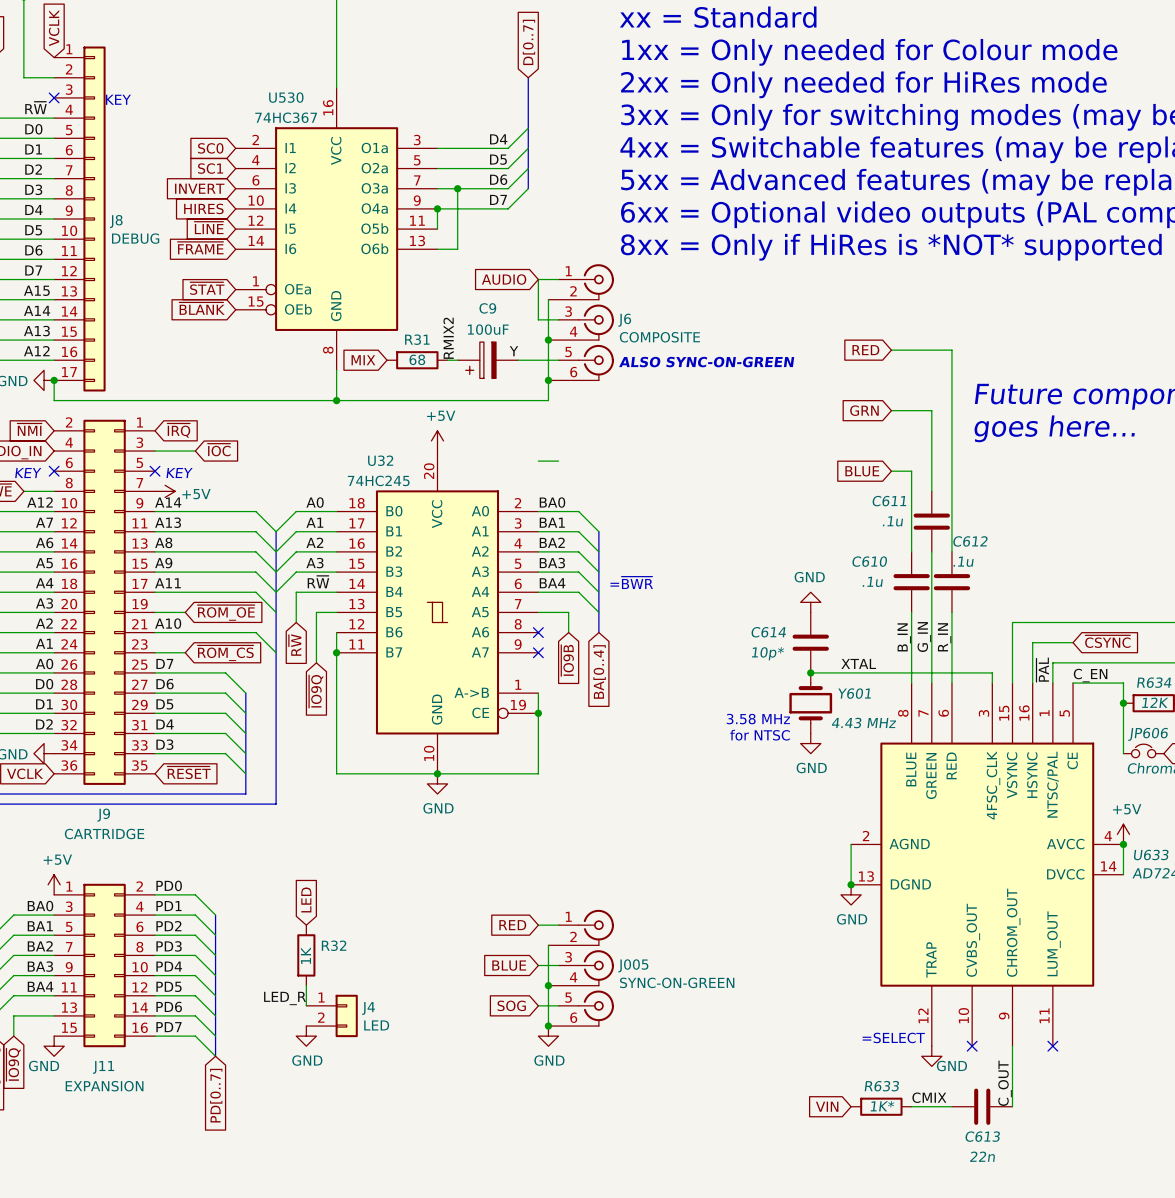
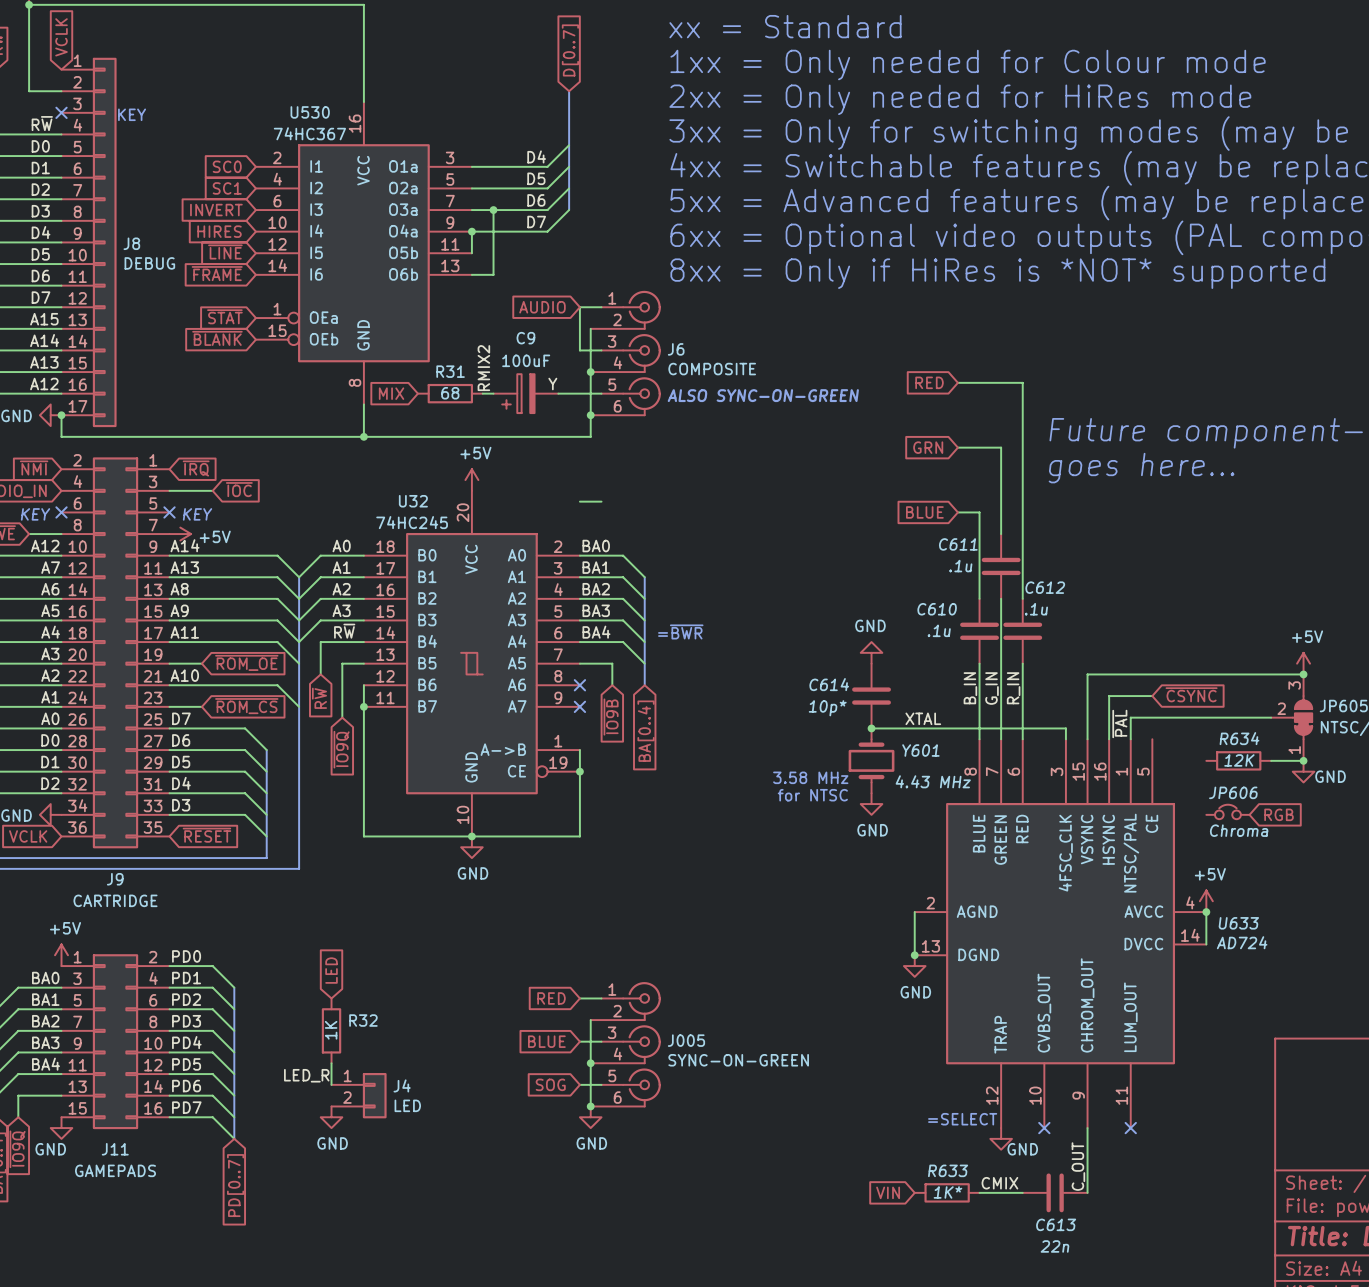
label: C_EN (1090, 675) -> none
wire: (1073, 683) (1123, 683) (1123, 753) -> none
junction: (1123, 703) -> none
J11 value: EXPANSION (104, 1086) -> GAMEPADS (115, 1170)

